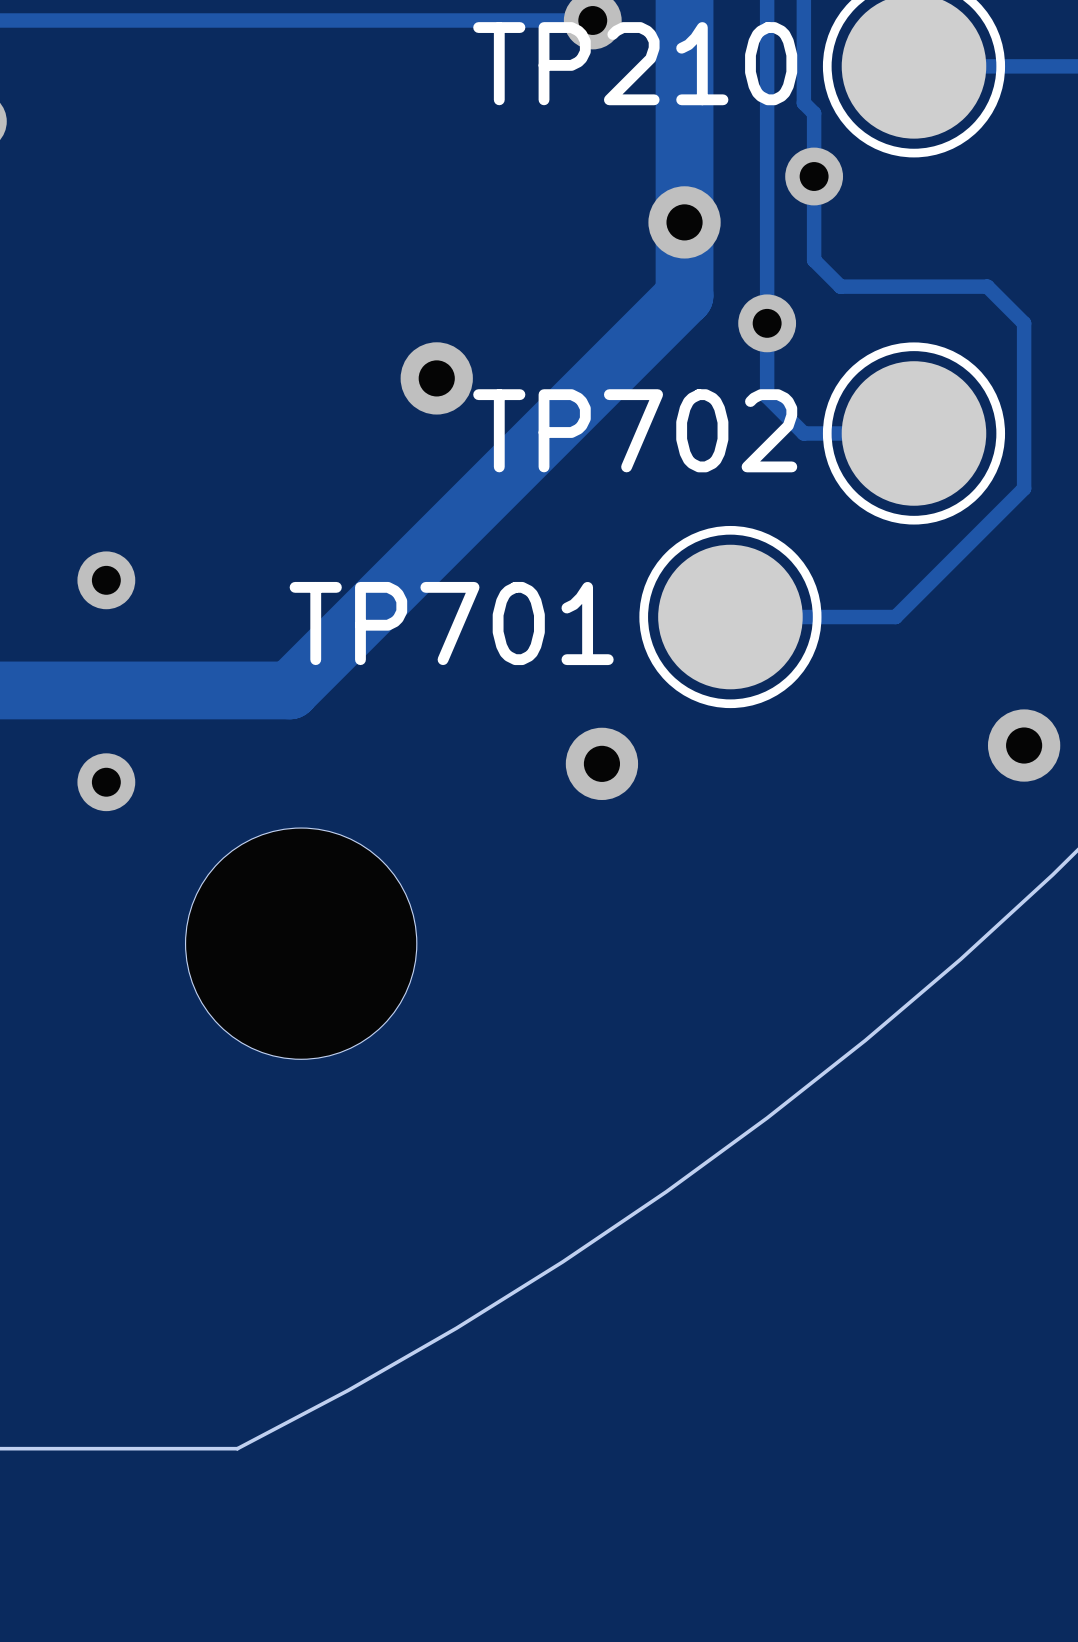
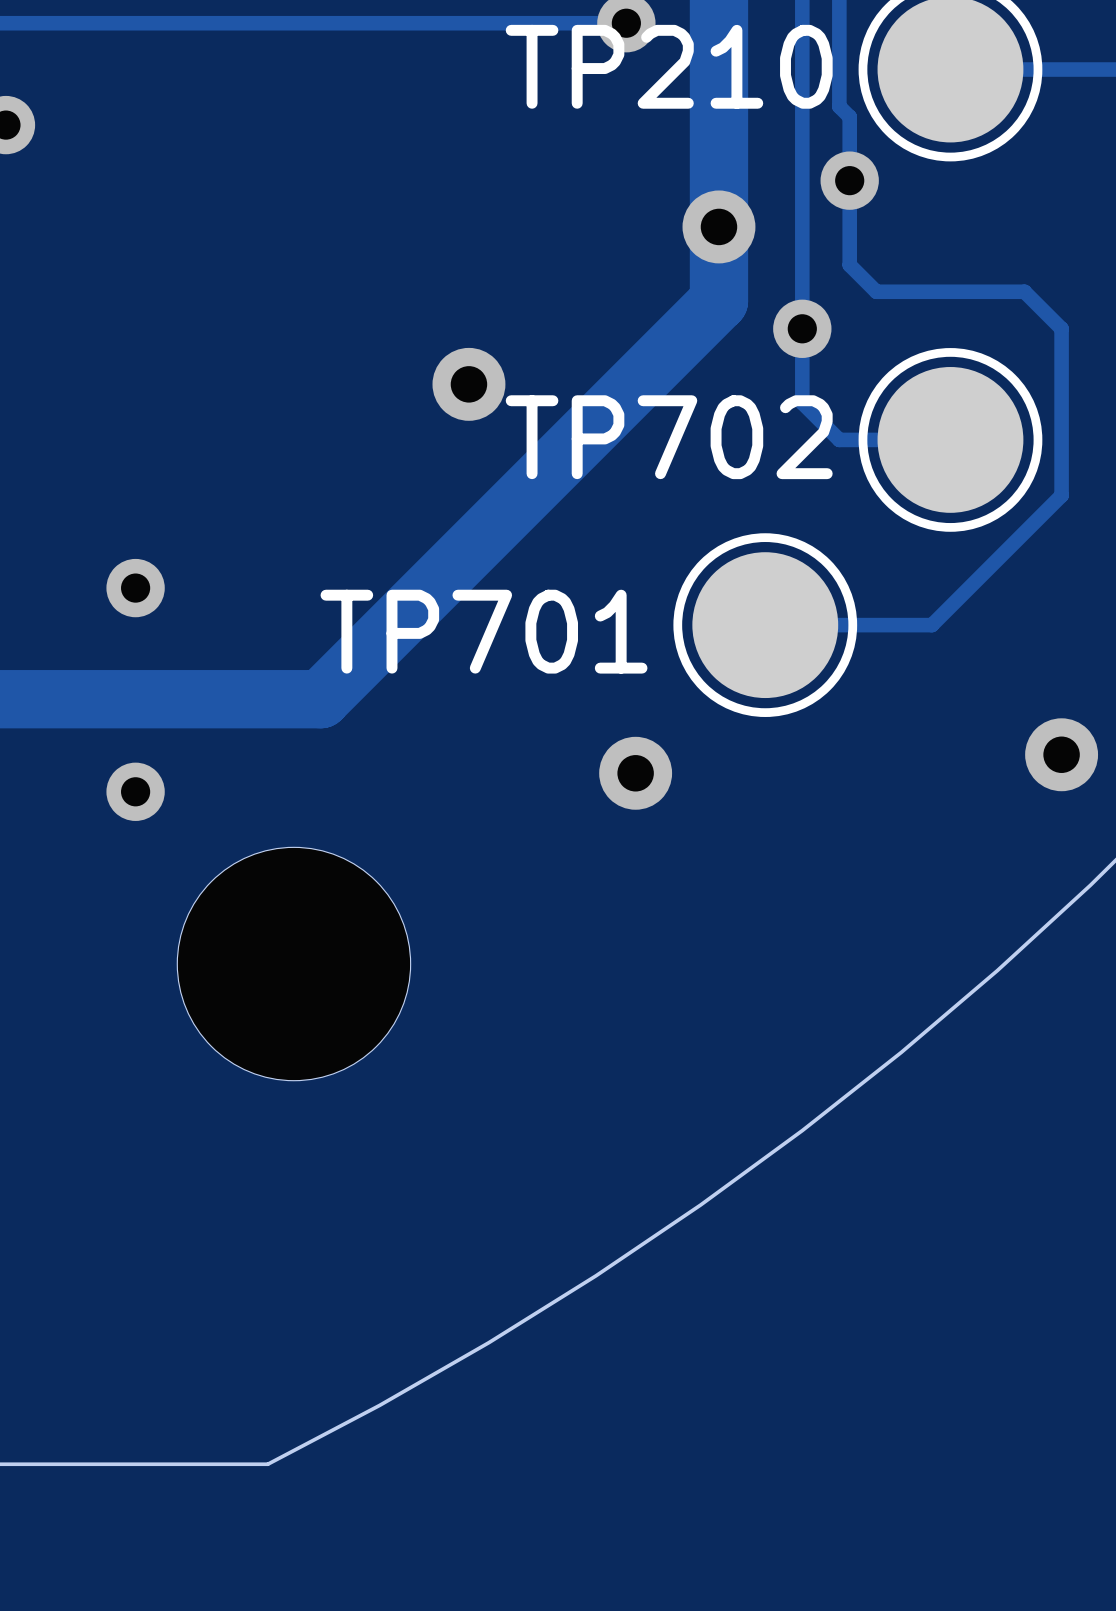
part position: (301, 943) -> (293, 964)

